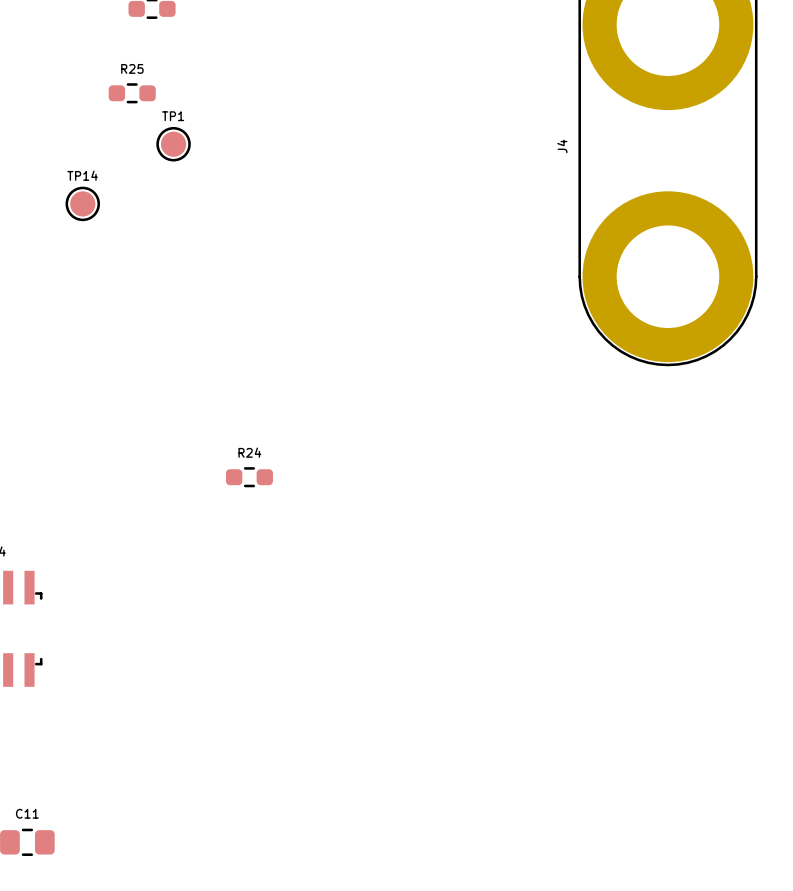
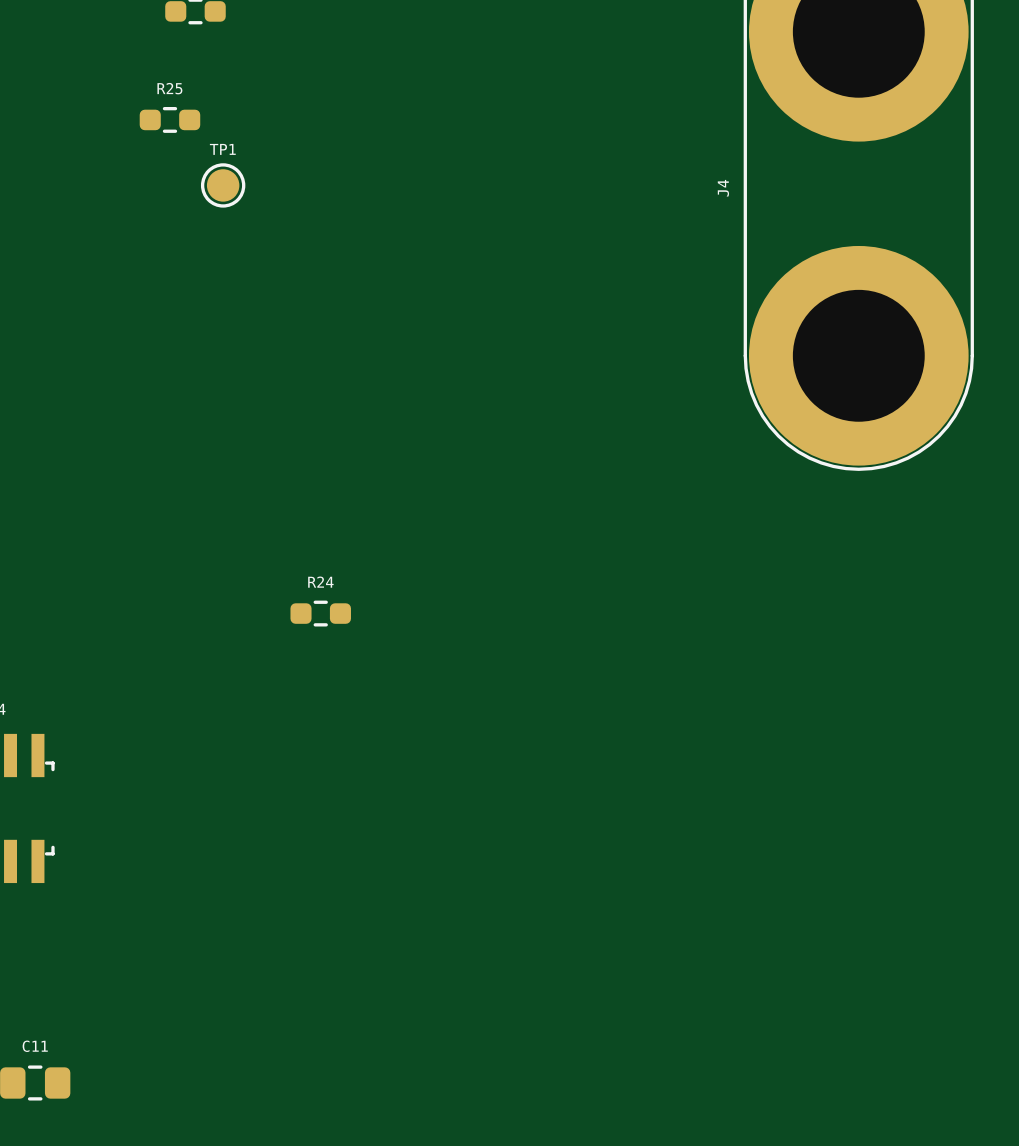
TP14: (82, 203) -> none

